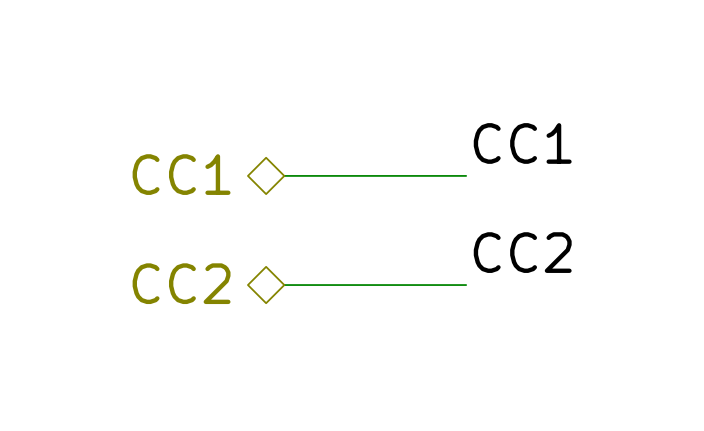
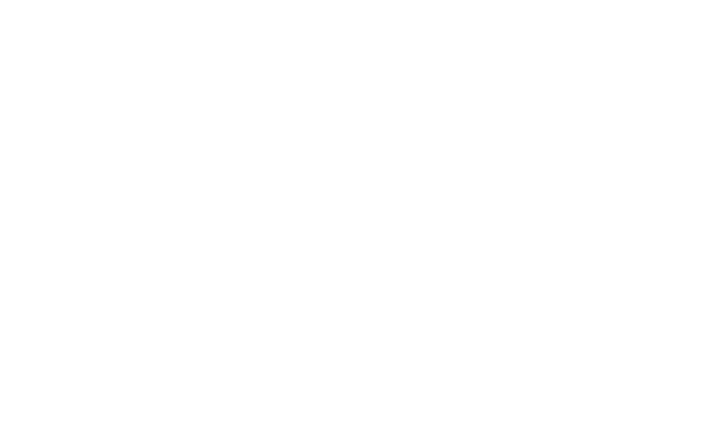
label: CC1 (522, 143) -> none
hierarchical label: CC1 (181, 174) -> none
wire: (284, 175) (466, 175) -> none
label: CC2 (522, 252) -> none
hierarchical label: CC2 (181, 283) -> none
wire: (284, 285) (466, 285) -> none

